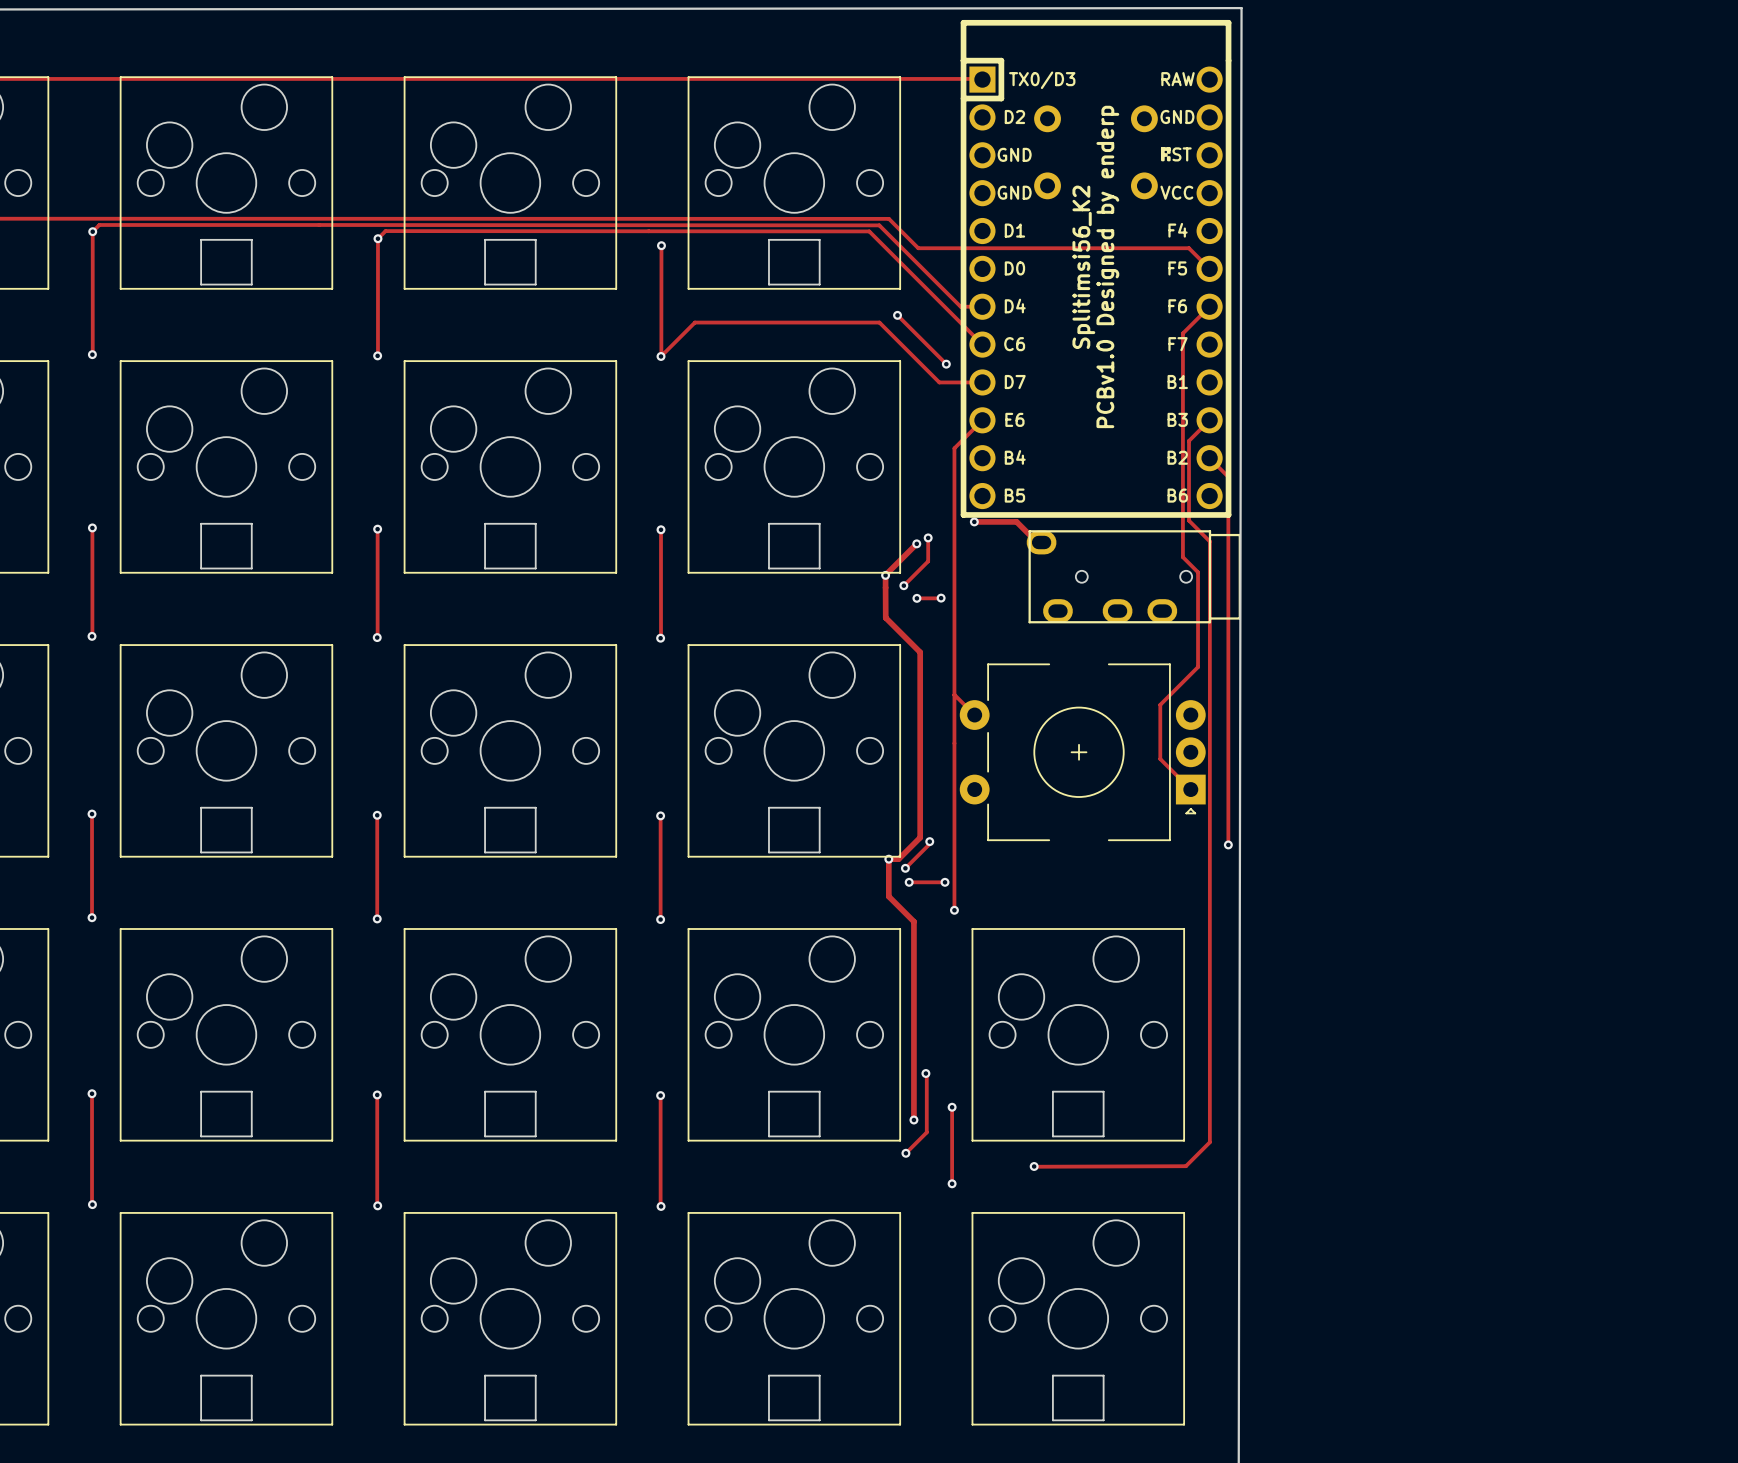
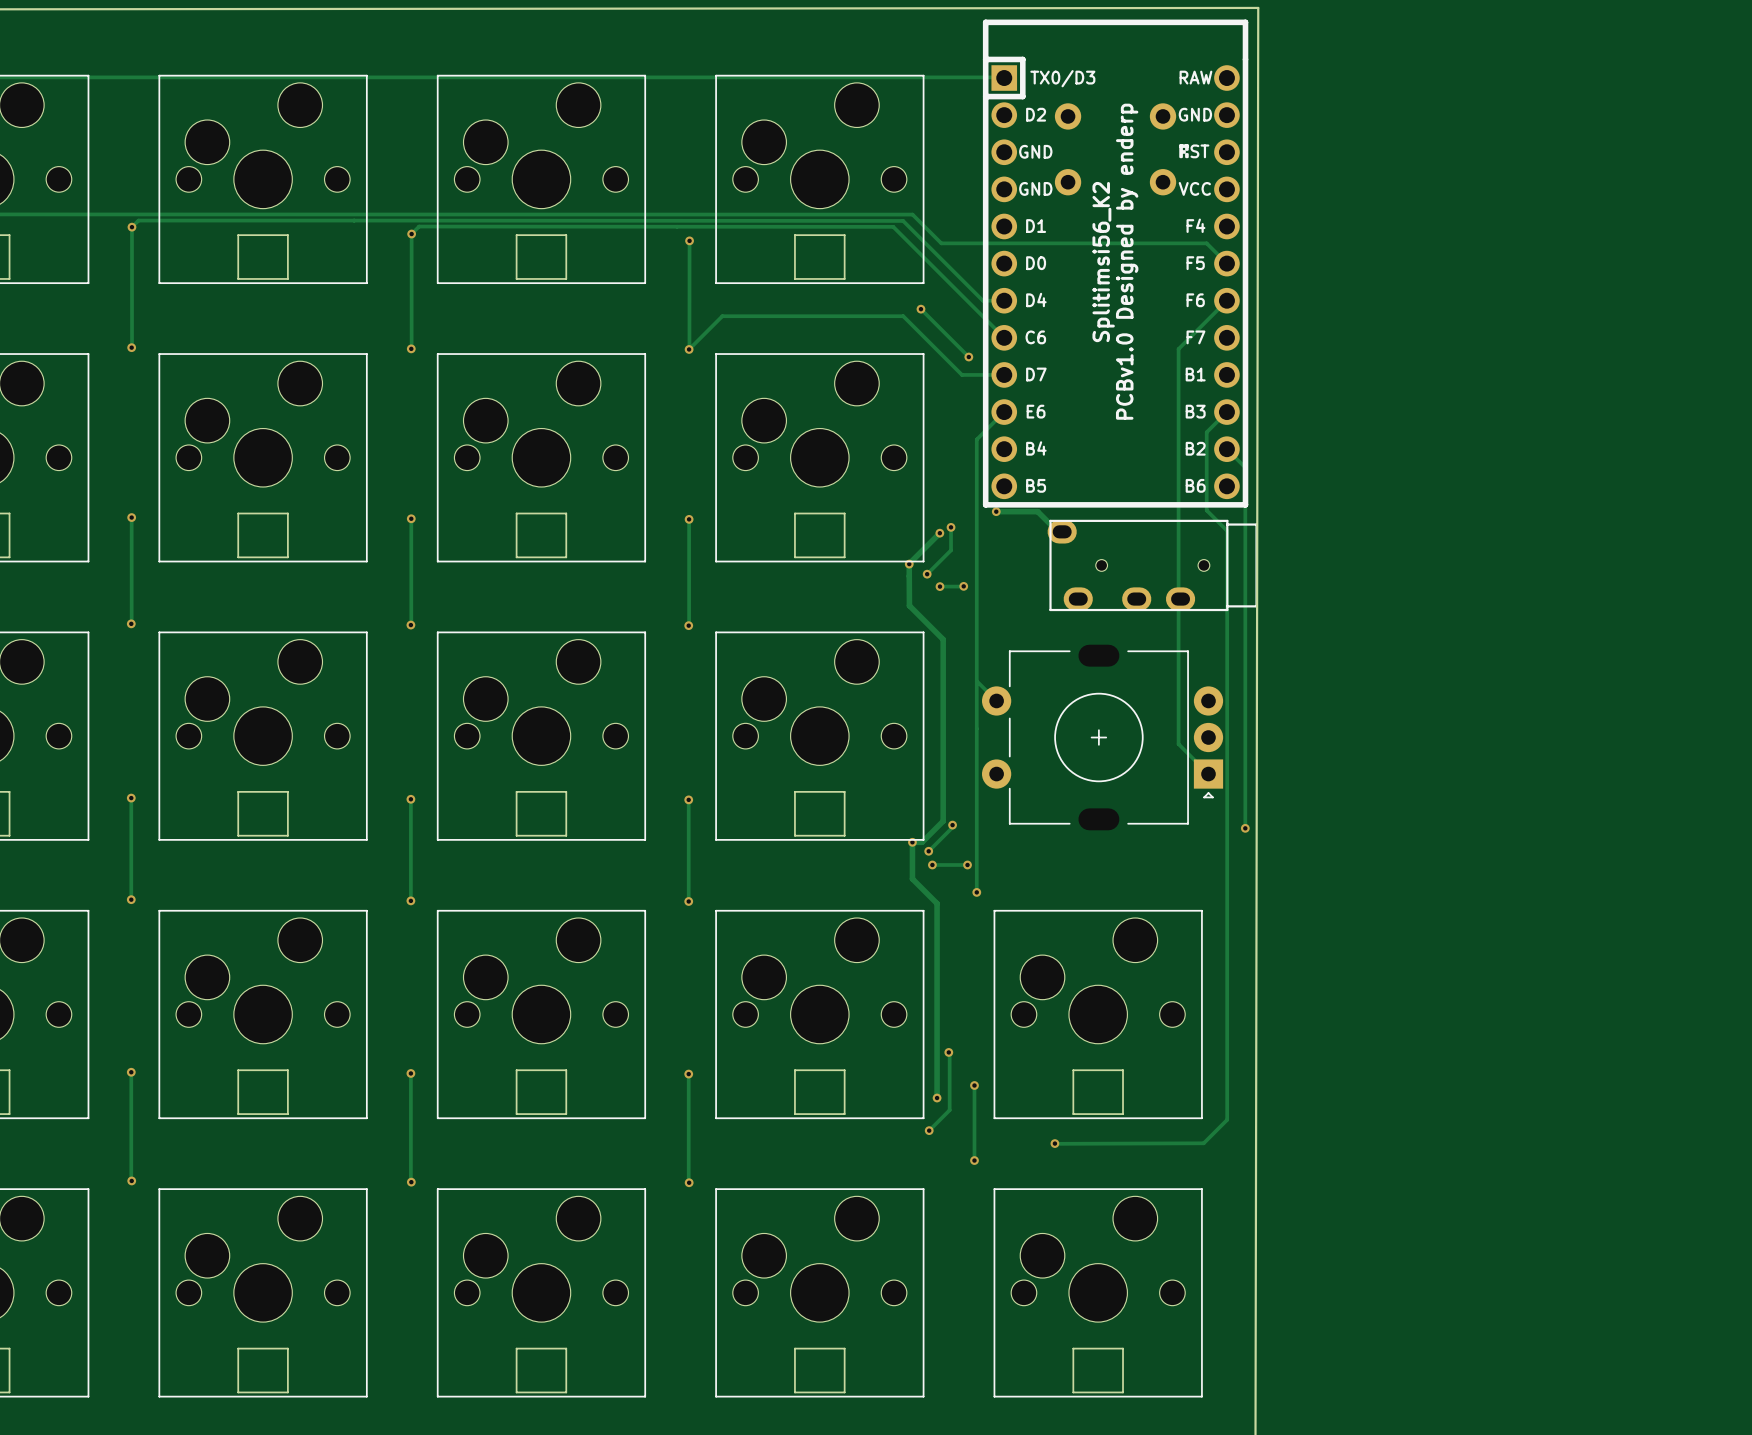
track: (1182, 333) (1182, 557) (1198, 572) (1198, 667) (1160, 704) -> (1200, 326) (1178, 349) (1178, 690)

